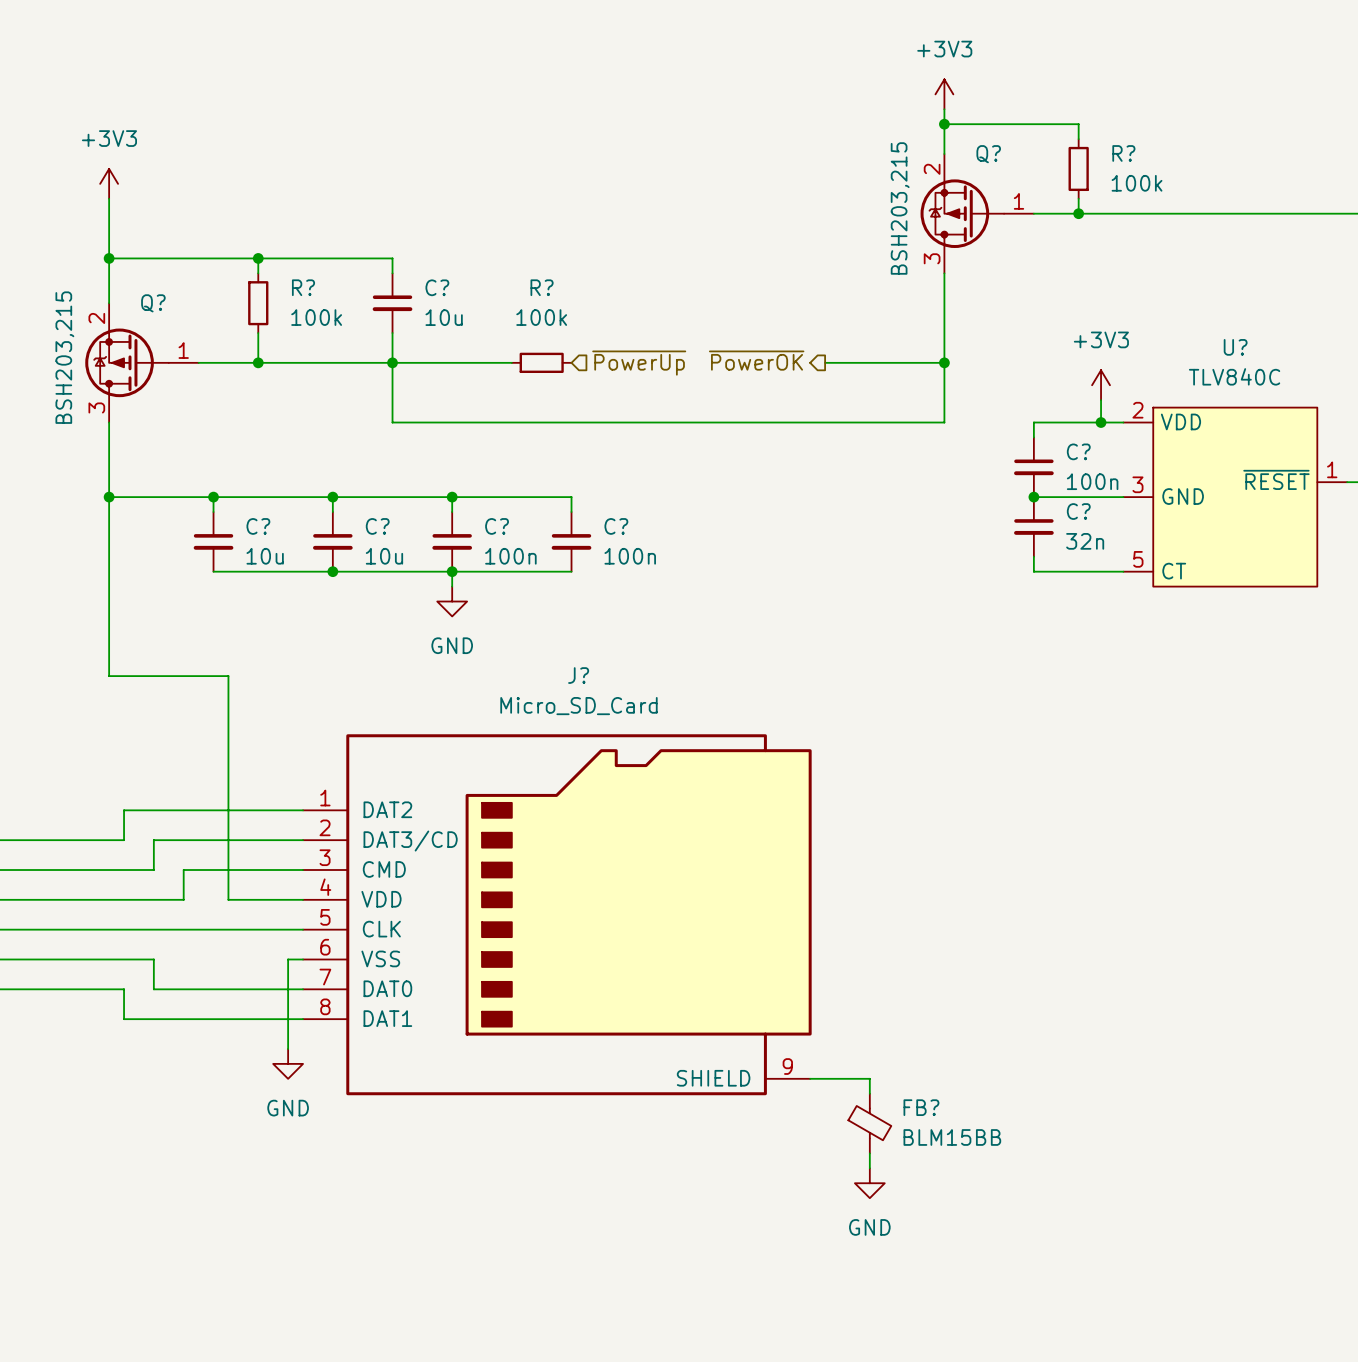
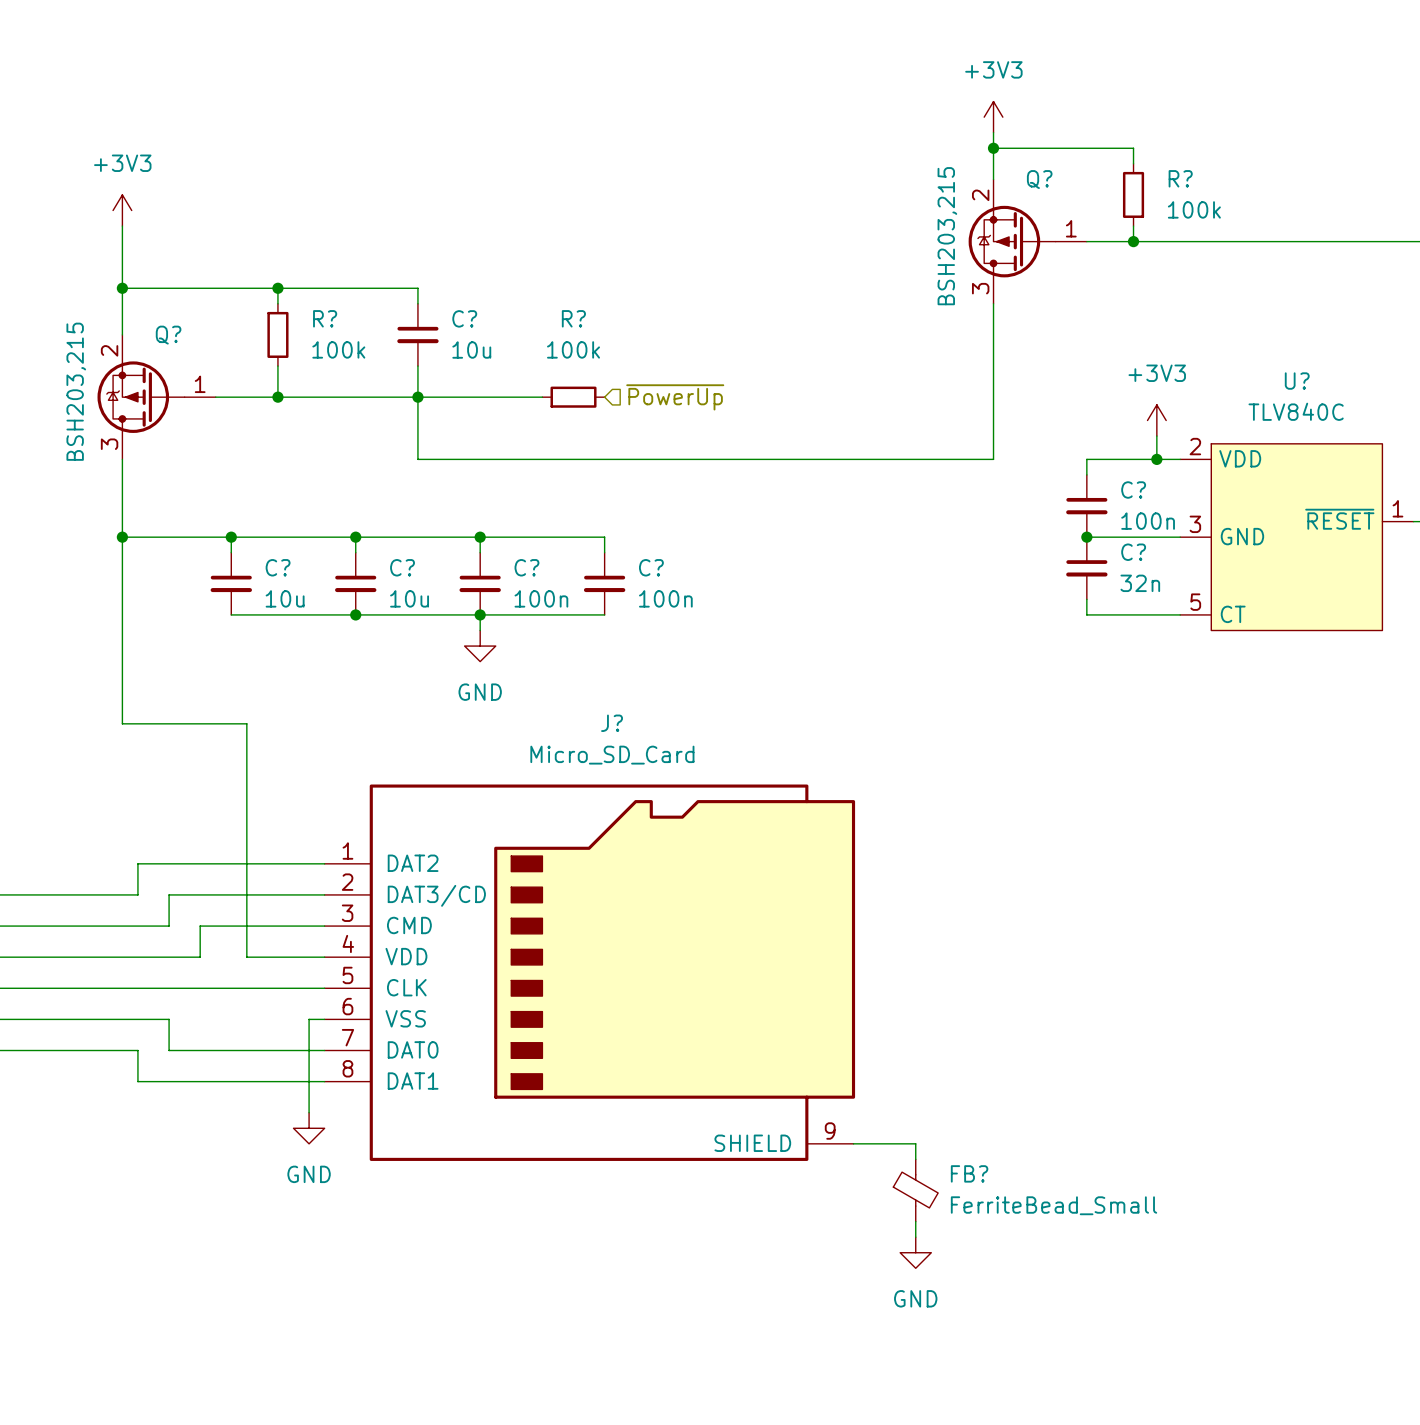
hierarchical label: ~{PowerOK} (756, 360) -> none
wire: (825, 362) (944, 362) -> none
junction: (944, 362) -> none
FB? value: BLM15BB (952, 1137) -> FerriteBead_Small (1054, 1205)

